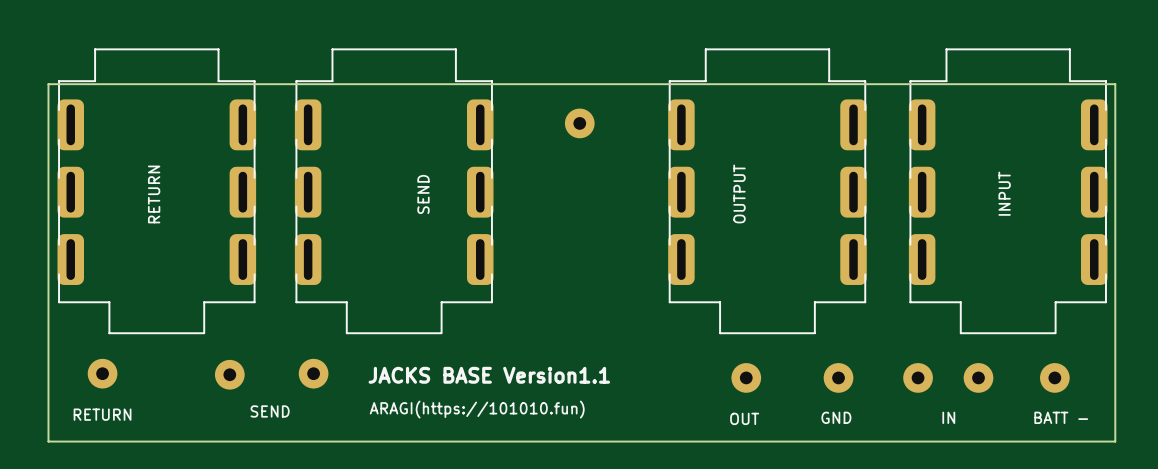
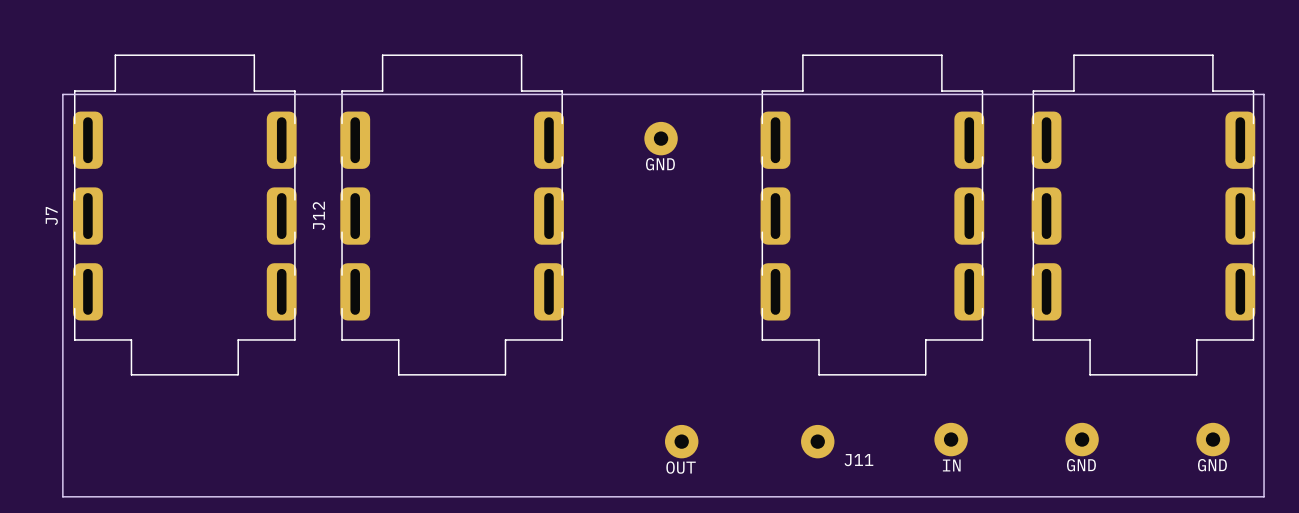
part text: none -> GND (660, 164)
J7 name: none -> J7 (51, 216)
J12 name: none -> J12 (318, 215)
text: OUTPUT (739, 193) -> none
text: INPUT (1004, 193) -> none
text: RETURN (154, 194) -> none
text: SEND (423, 194) -> none
part: (102, 373) -> none
part: (313, 373) -> none
part: (229, 374) -> none
text: JACKS BASE Version1.1 (489, 375) -> none
part: (746, 377) -> none
part: (838, 377) -> none
part: (918, 377) -> none
part: (978, 377) -> none
part: (1054, 377) -> none
part: none -> (951, 439)
part: none -> (1082, 439)
part: none -> (1213, 439)
part: none -> (681, 441)
J11: none -> (817, 441)
text: ARAGI(https://101010.fun) (477, 409) -> none
text: SEND (270, 411) -> none
text: RETURN (102, 414) -> none
text: GND (836, 417) -> none
text: IN (948, 417) -> none
text: BATT - (1061, 417) -> none
text: OUT (744, 418) -> none

